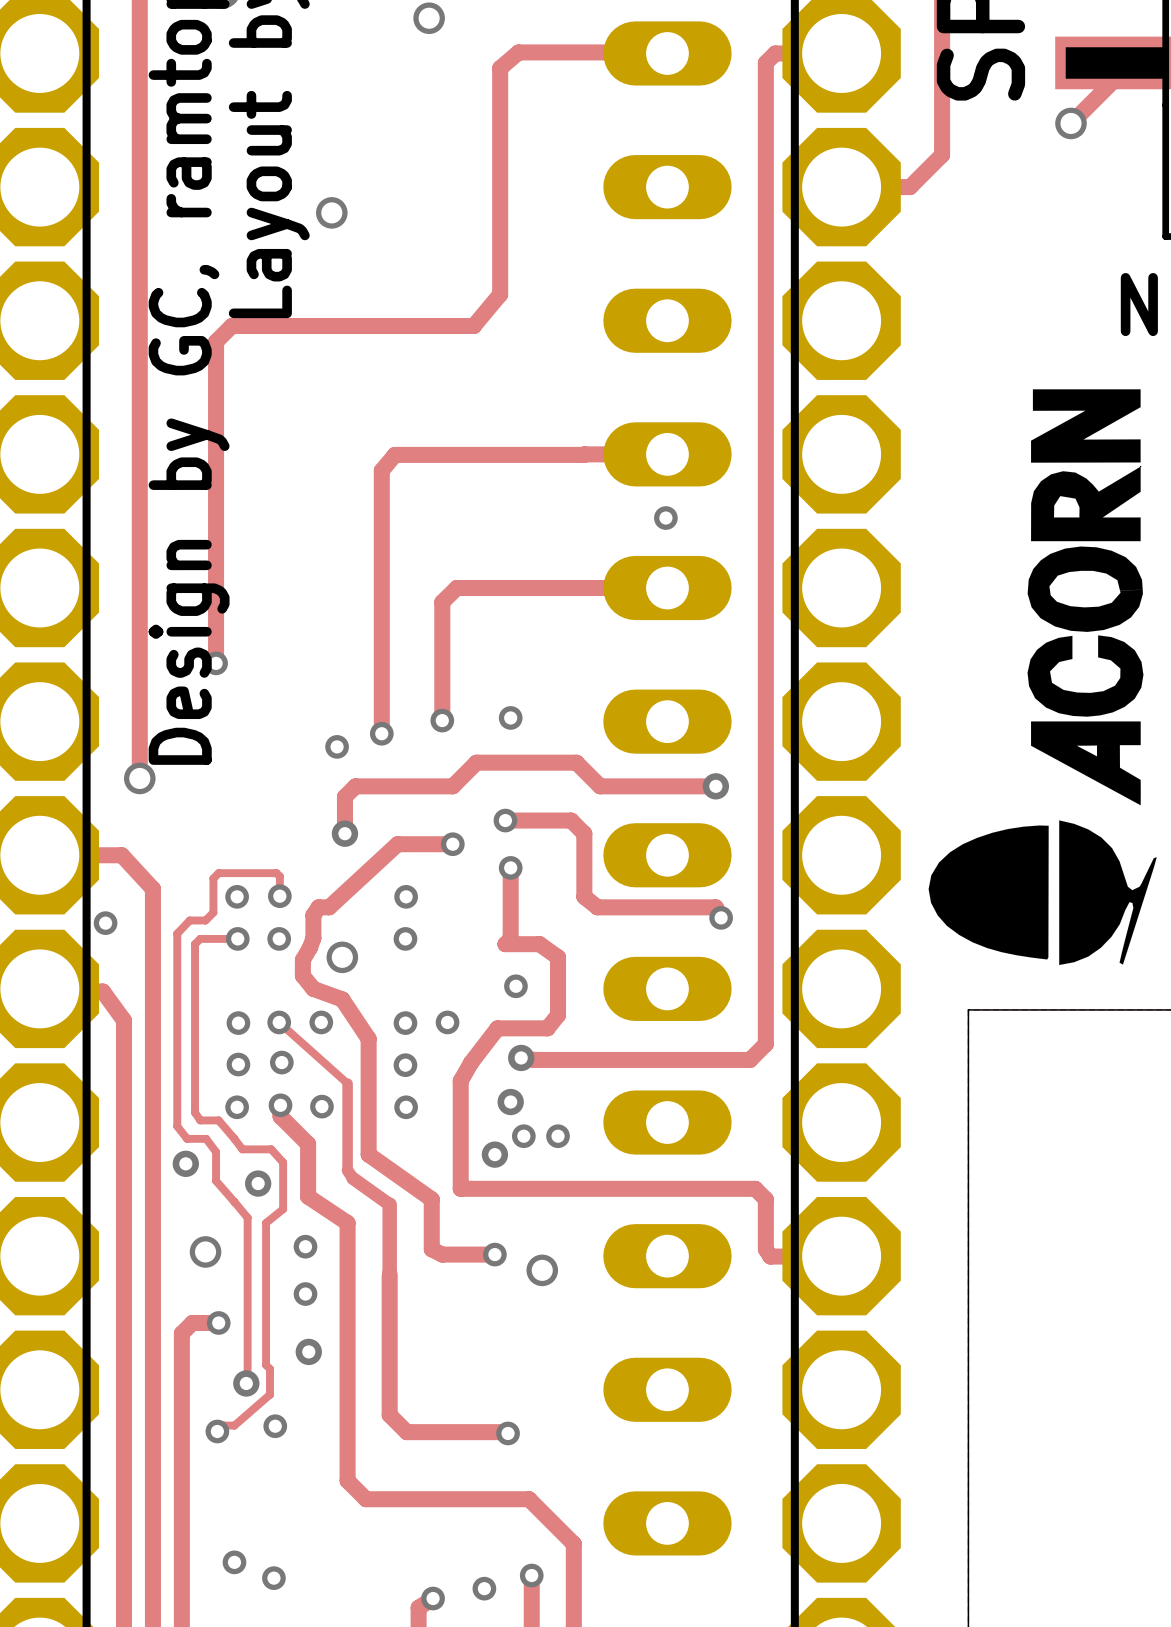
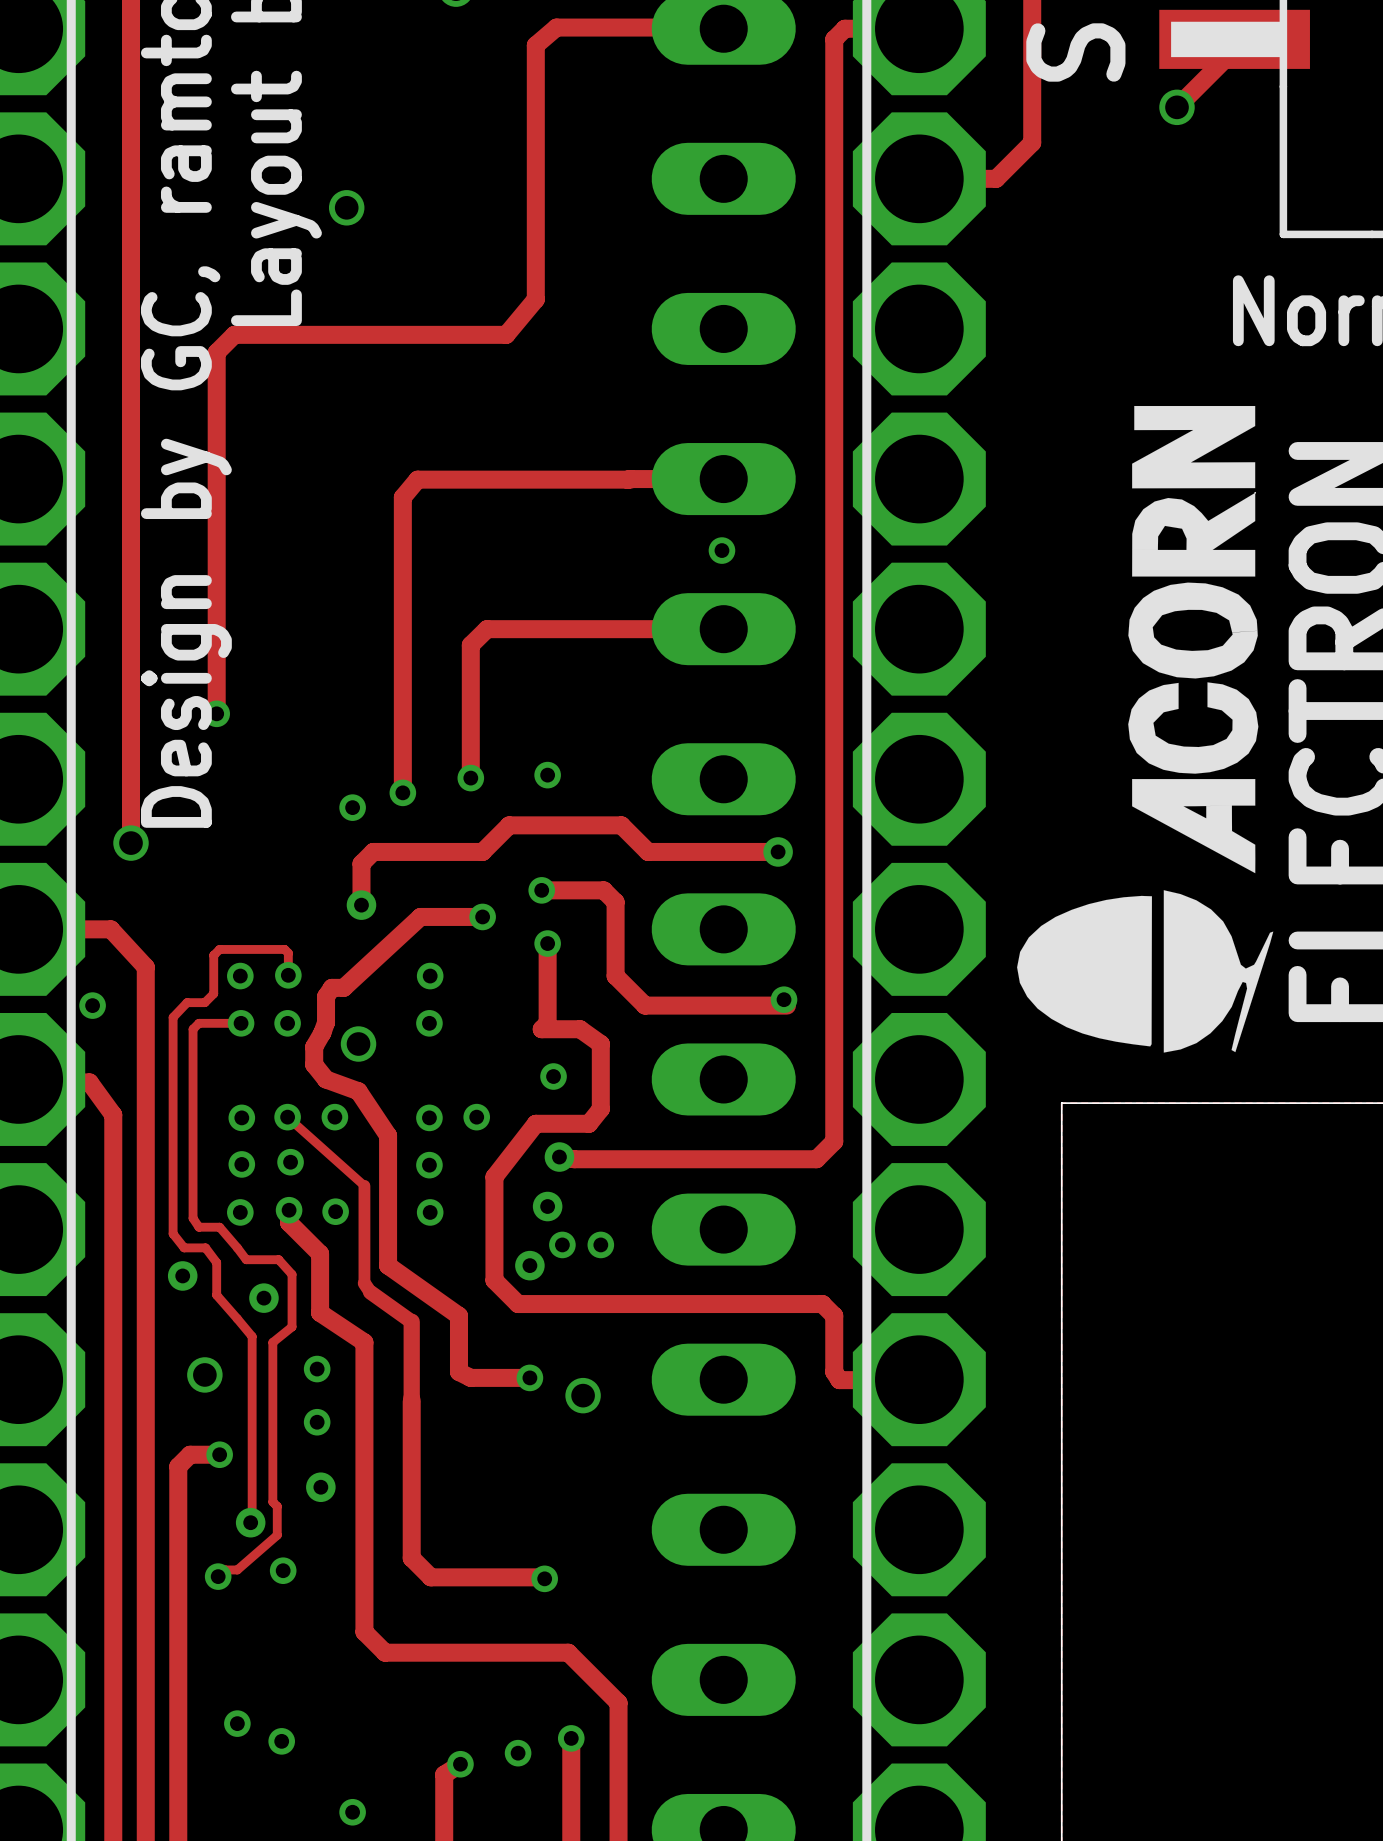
track: (560, 820) (571, 820) (584, 833) (584, 896) (597, 907) (715, 907) (721, 917) -> (603, 890) (615, 902) (615, 976) (645, 1005) (786, 1005)
track: (500, 1028) (497, 1028) (471, 1062) (460, 1080) (460, 1188) (484, 1188) -> (535, 1123) (494, 1176) (494, 1280) (518, 1304)

